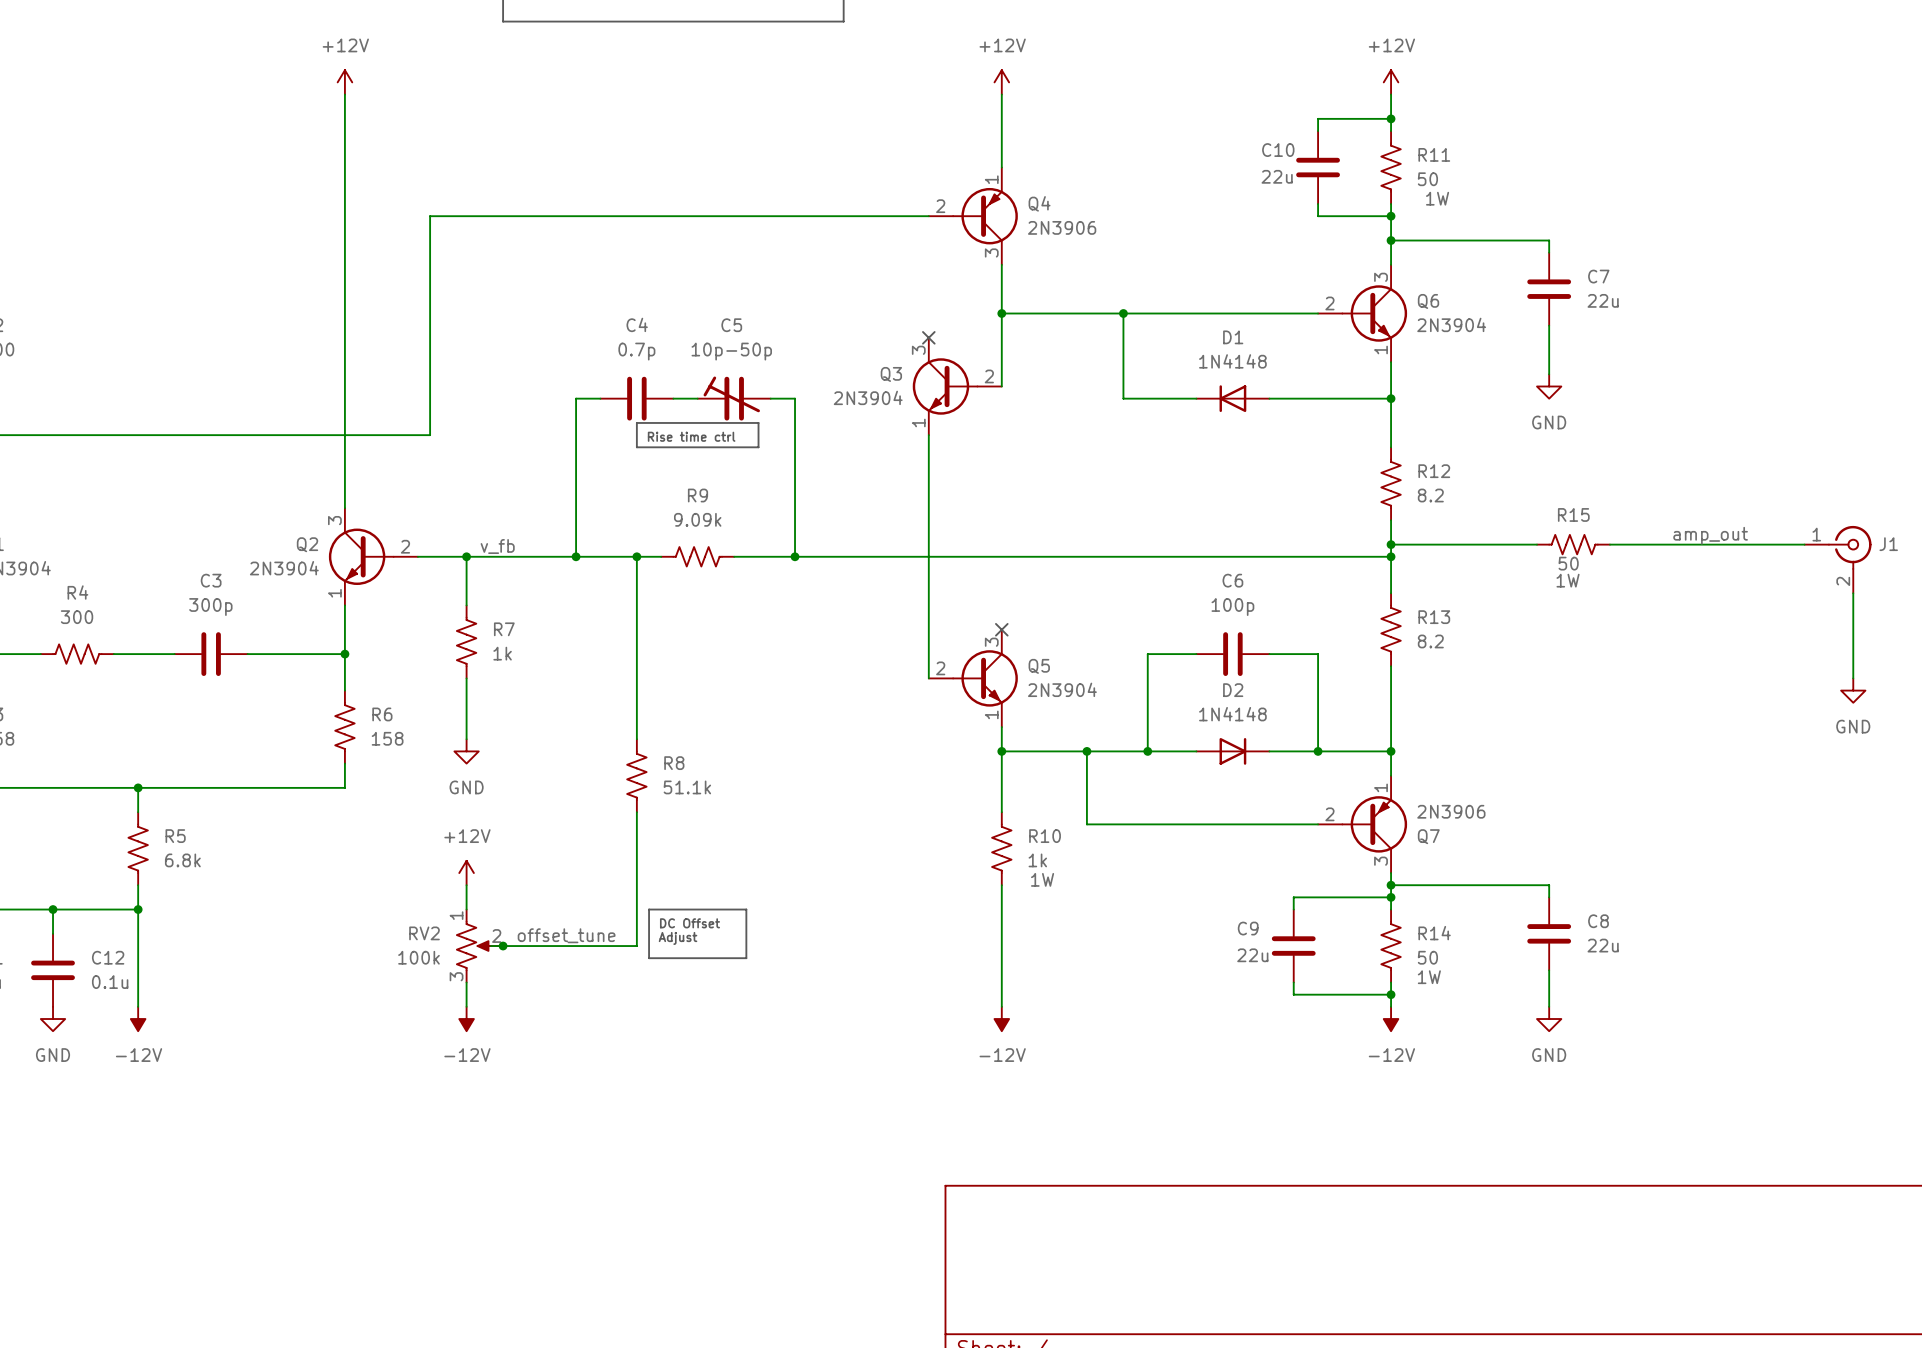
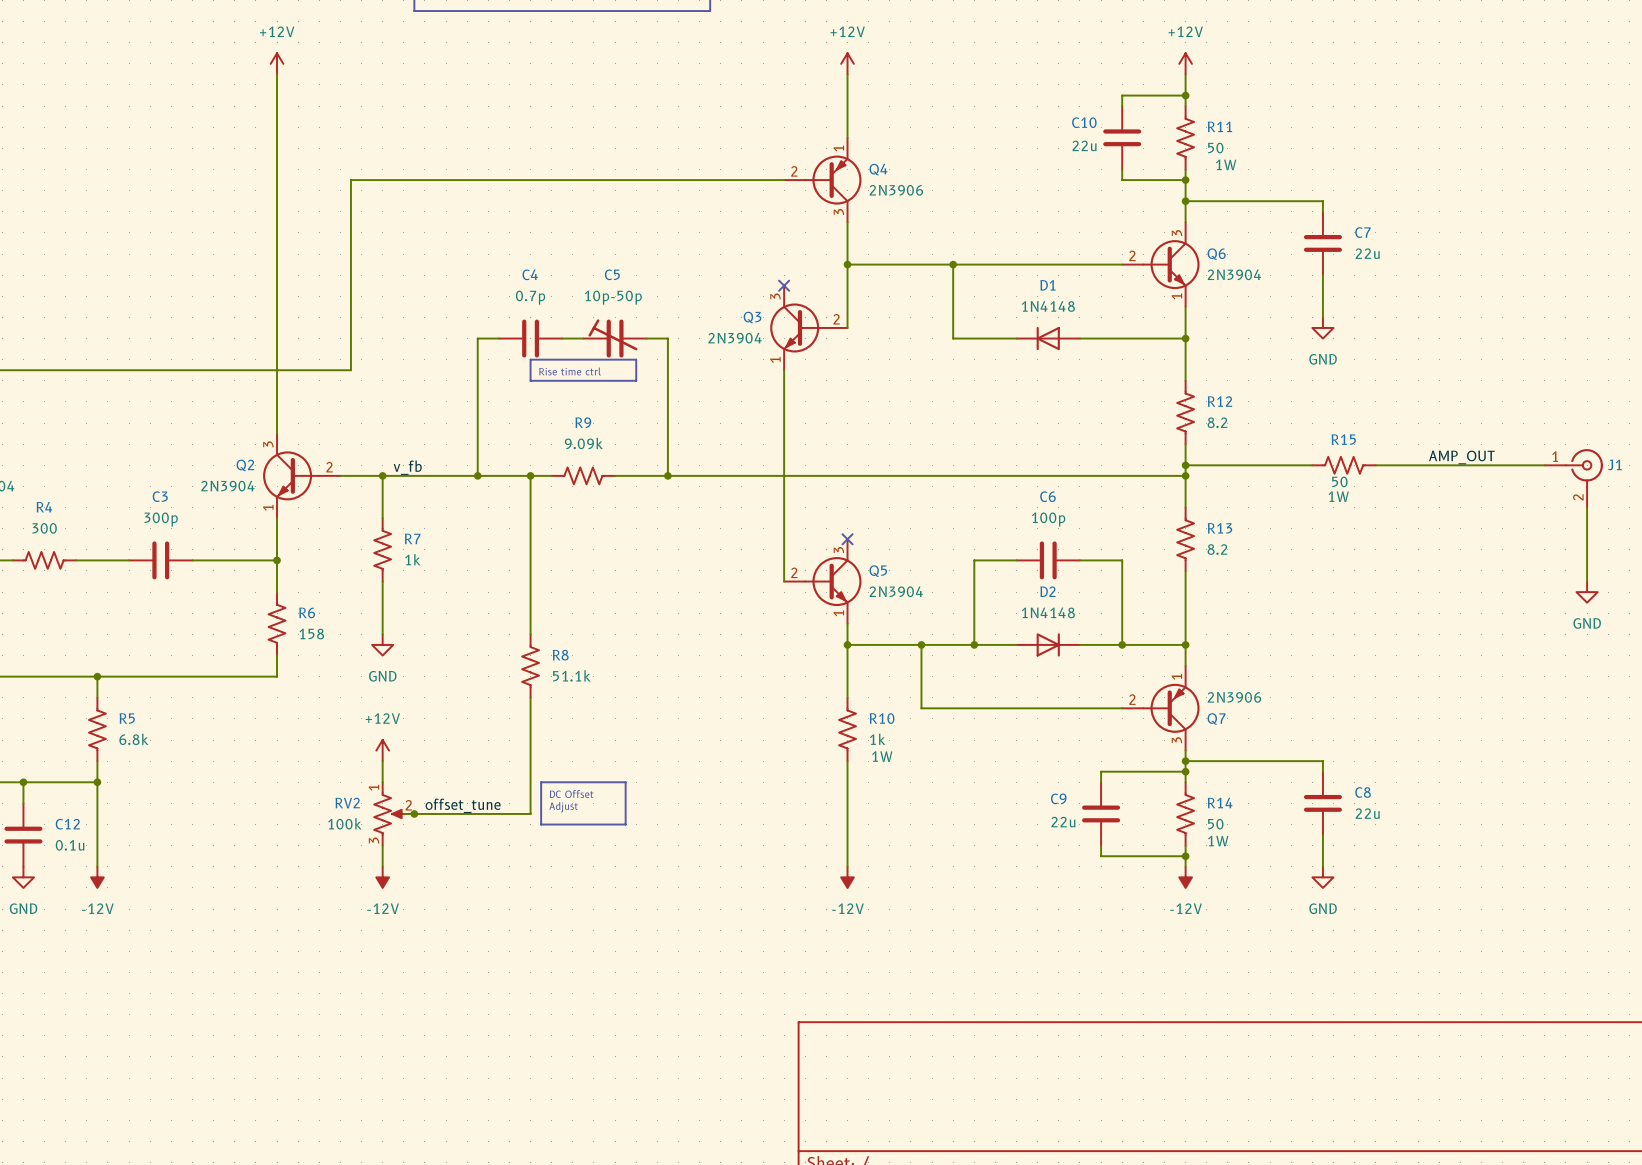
label: amp_out (1710, 535) -> AMP_OUT (1461, 457)

